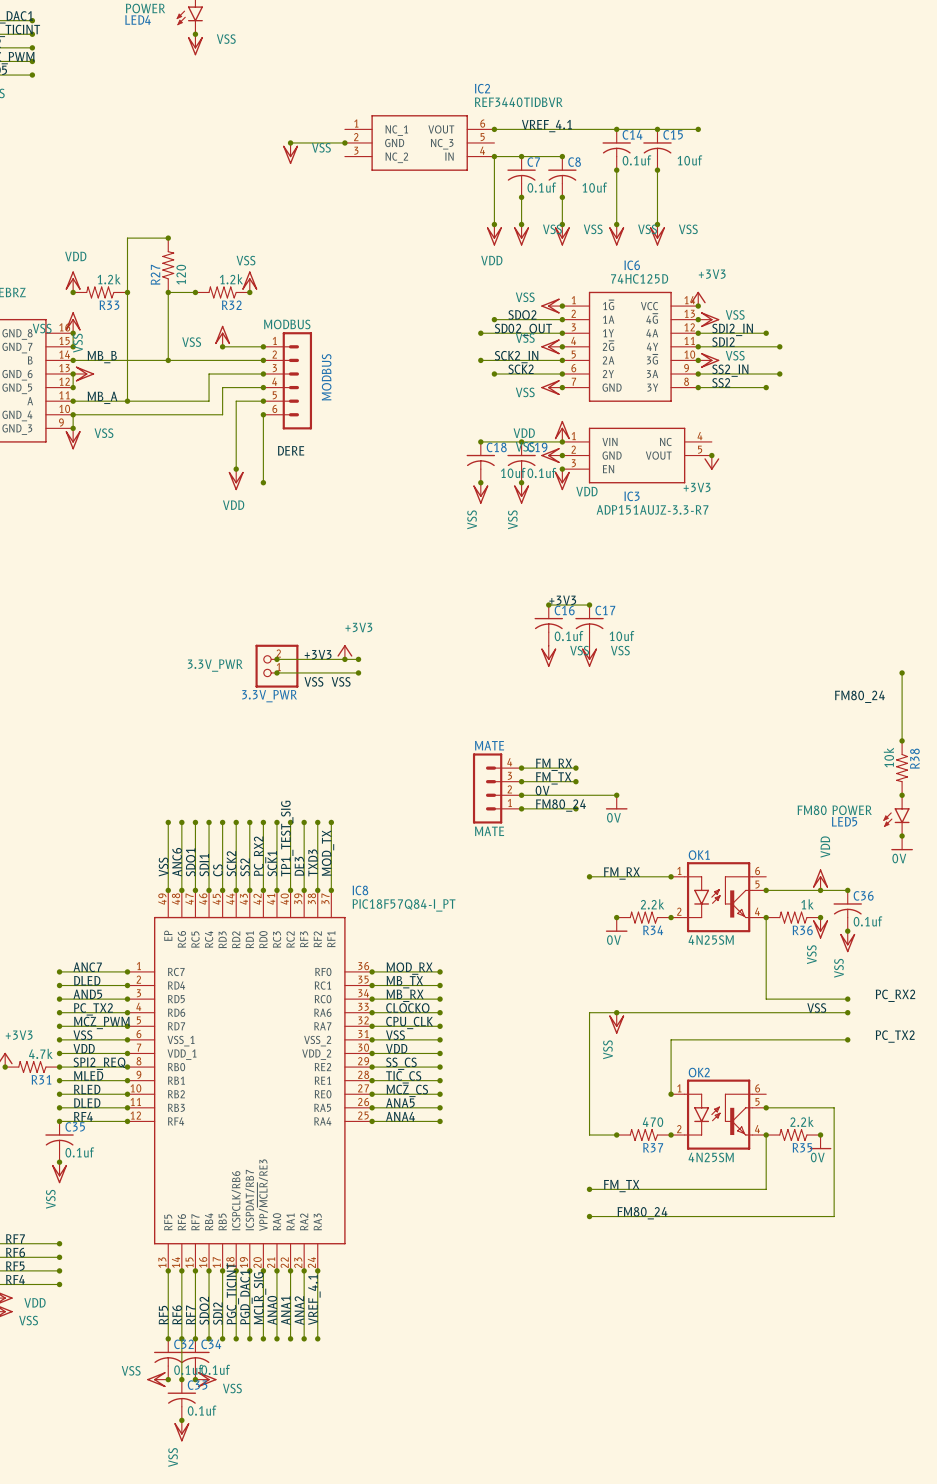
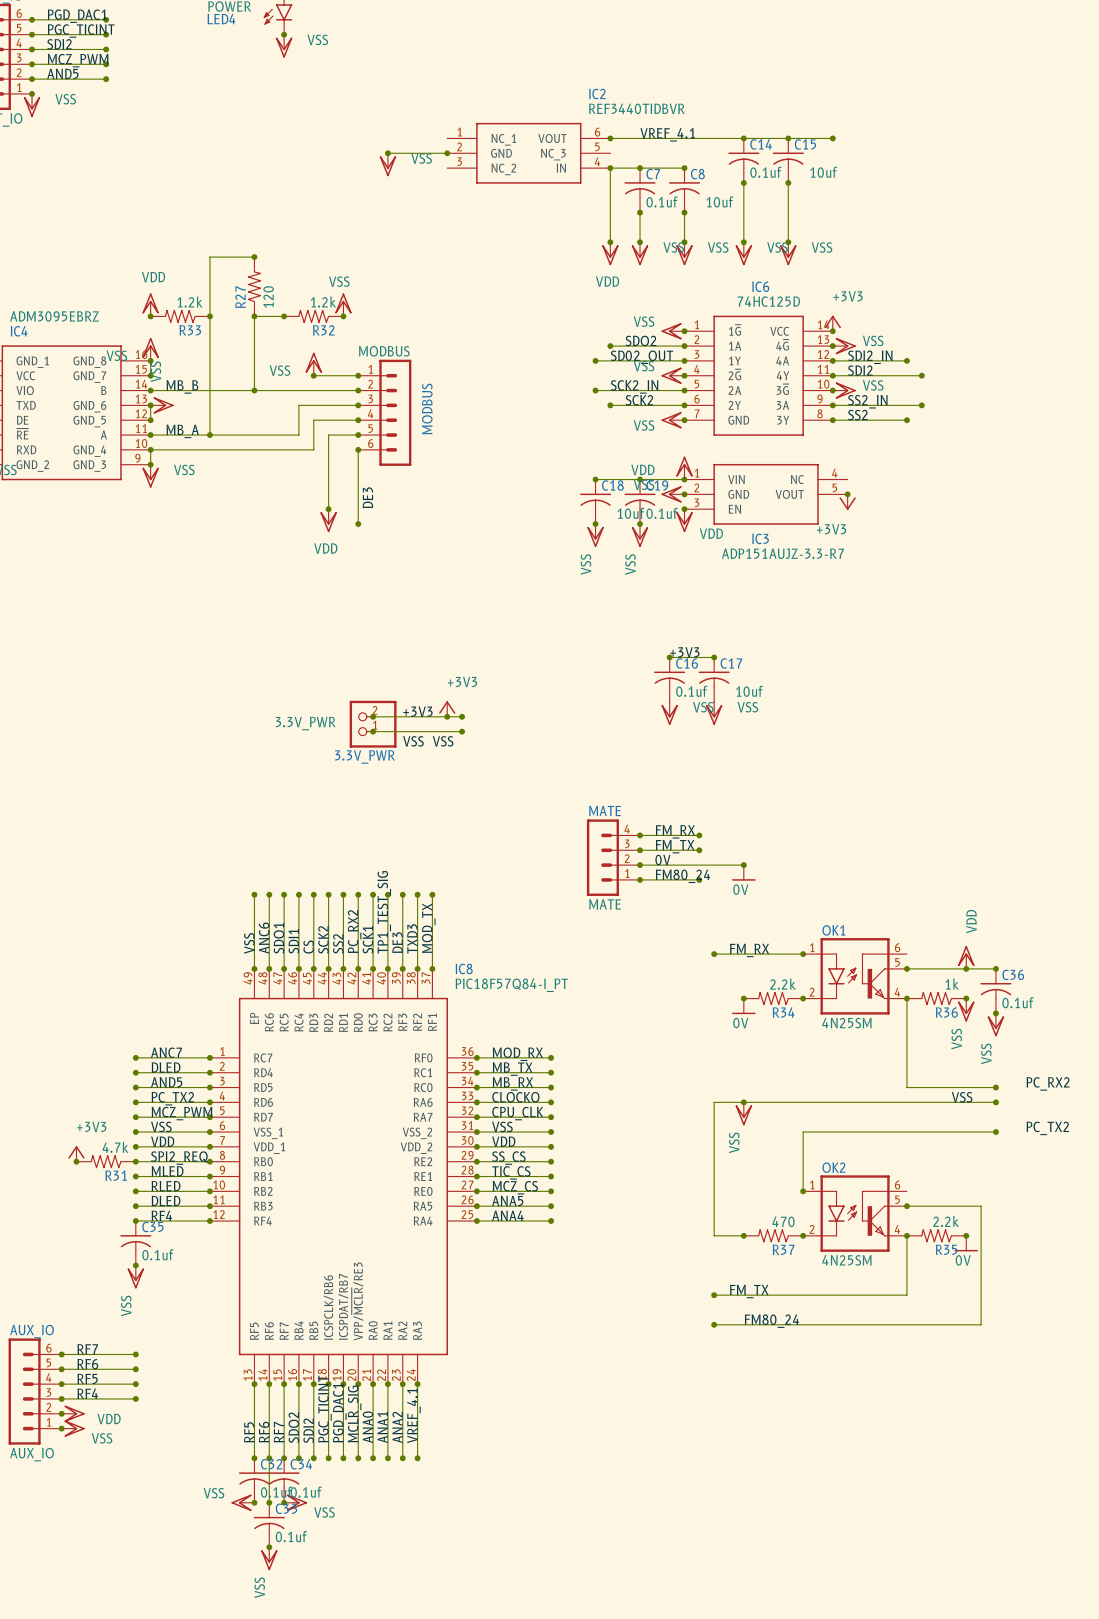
label: DERE (291, 450) -> none
label: none -> DE3 (367, 497)
wire: (902, 672) (902, 740) -> none
junction: (902, 672) -> none
label: FM80_24 (859, 696) -> none
junction: (902, 740) -> none
R38: 10k (902, 768) -> none
junction: (902, 795) -> none
LED5: FM80 POWER (896, 815) -> none
junction: (902, 836) -> none
power symbol: 0V (902, 843) -> none

